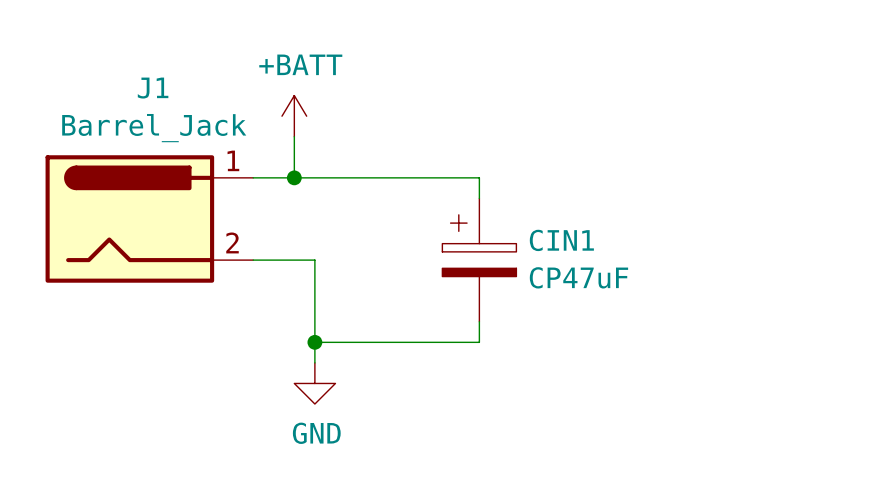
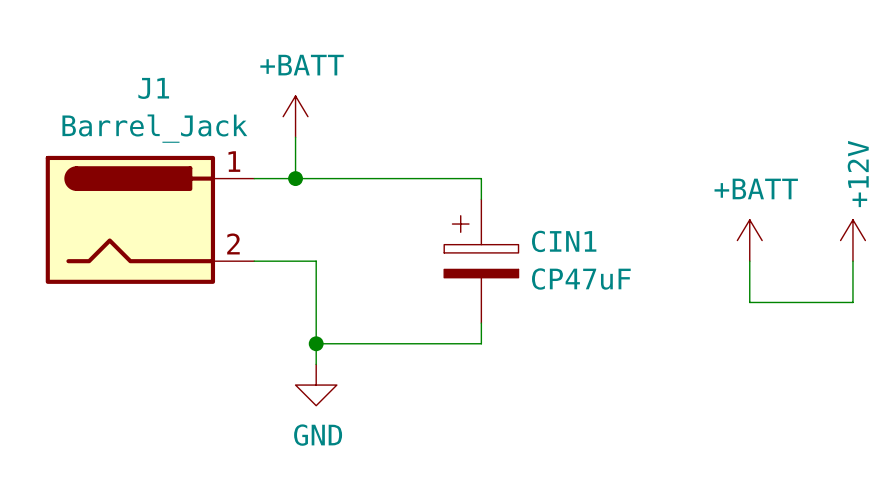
power symbol: none -> +BATT (749, 240)
power symbol: none -> +12V (852, 240)
wire: none -> (749, 261) (749, 302) (852, 302) (852, 261)

